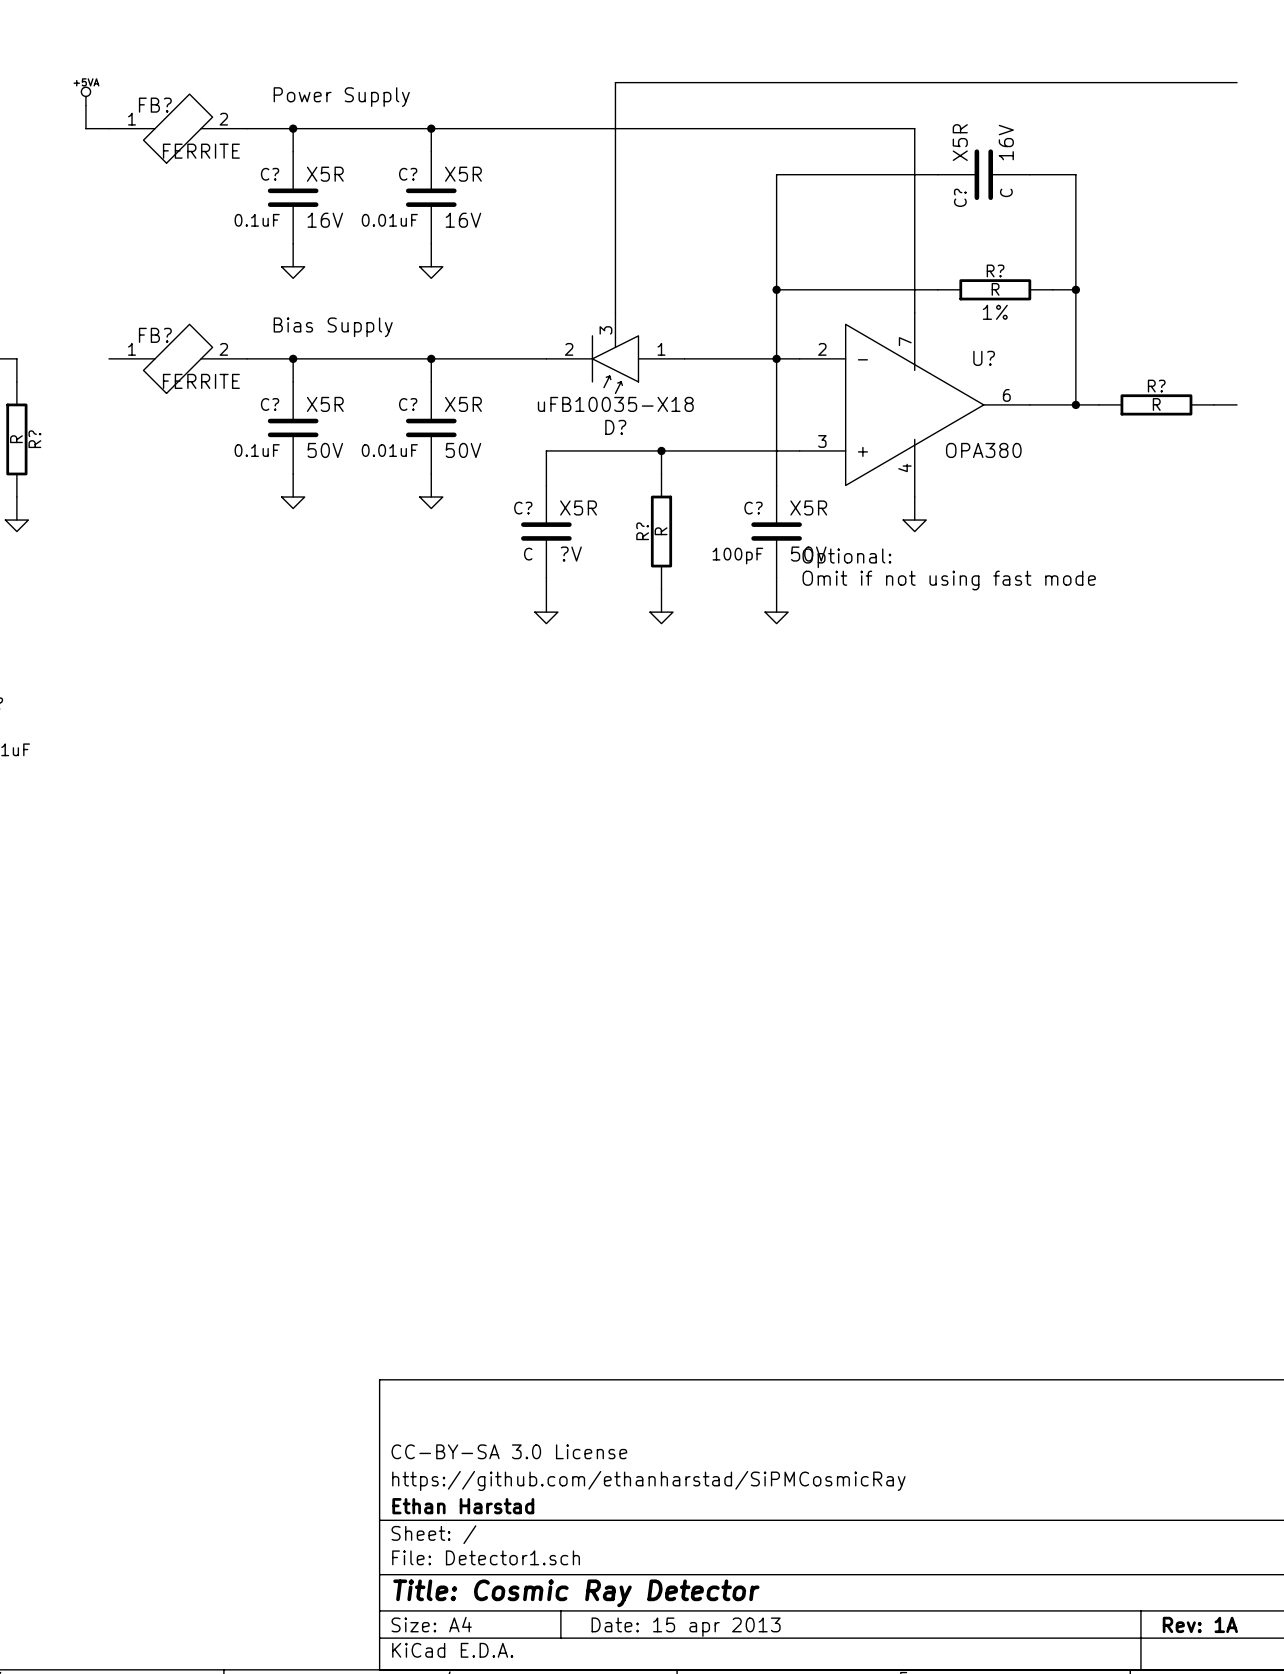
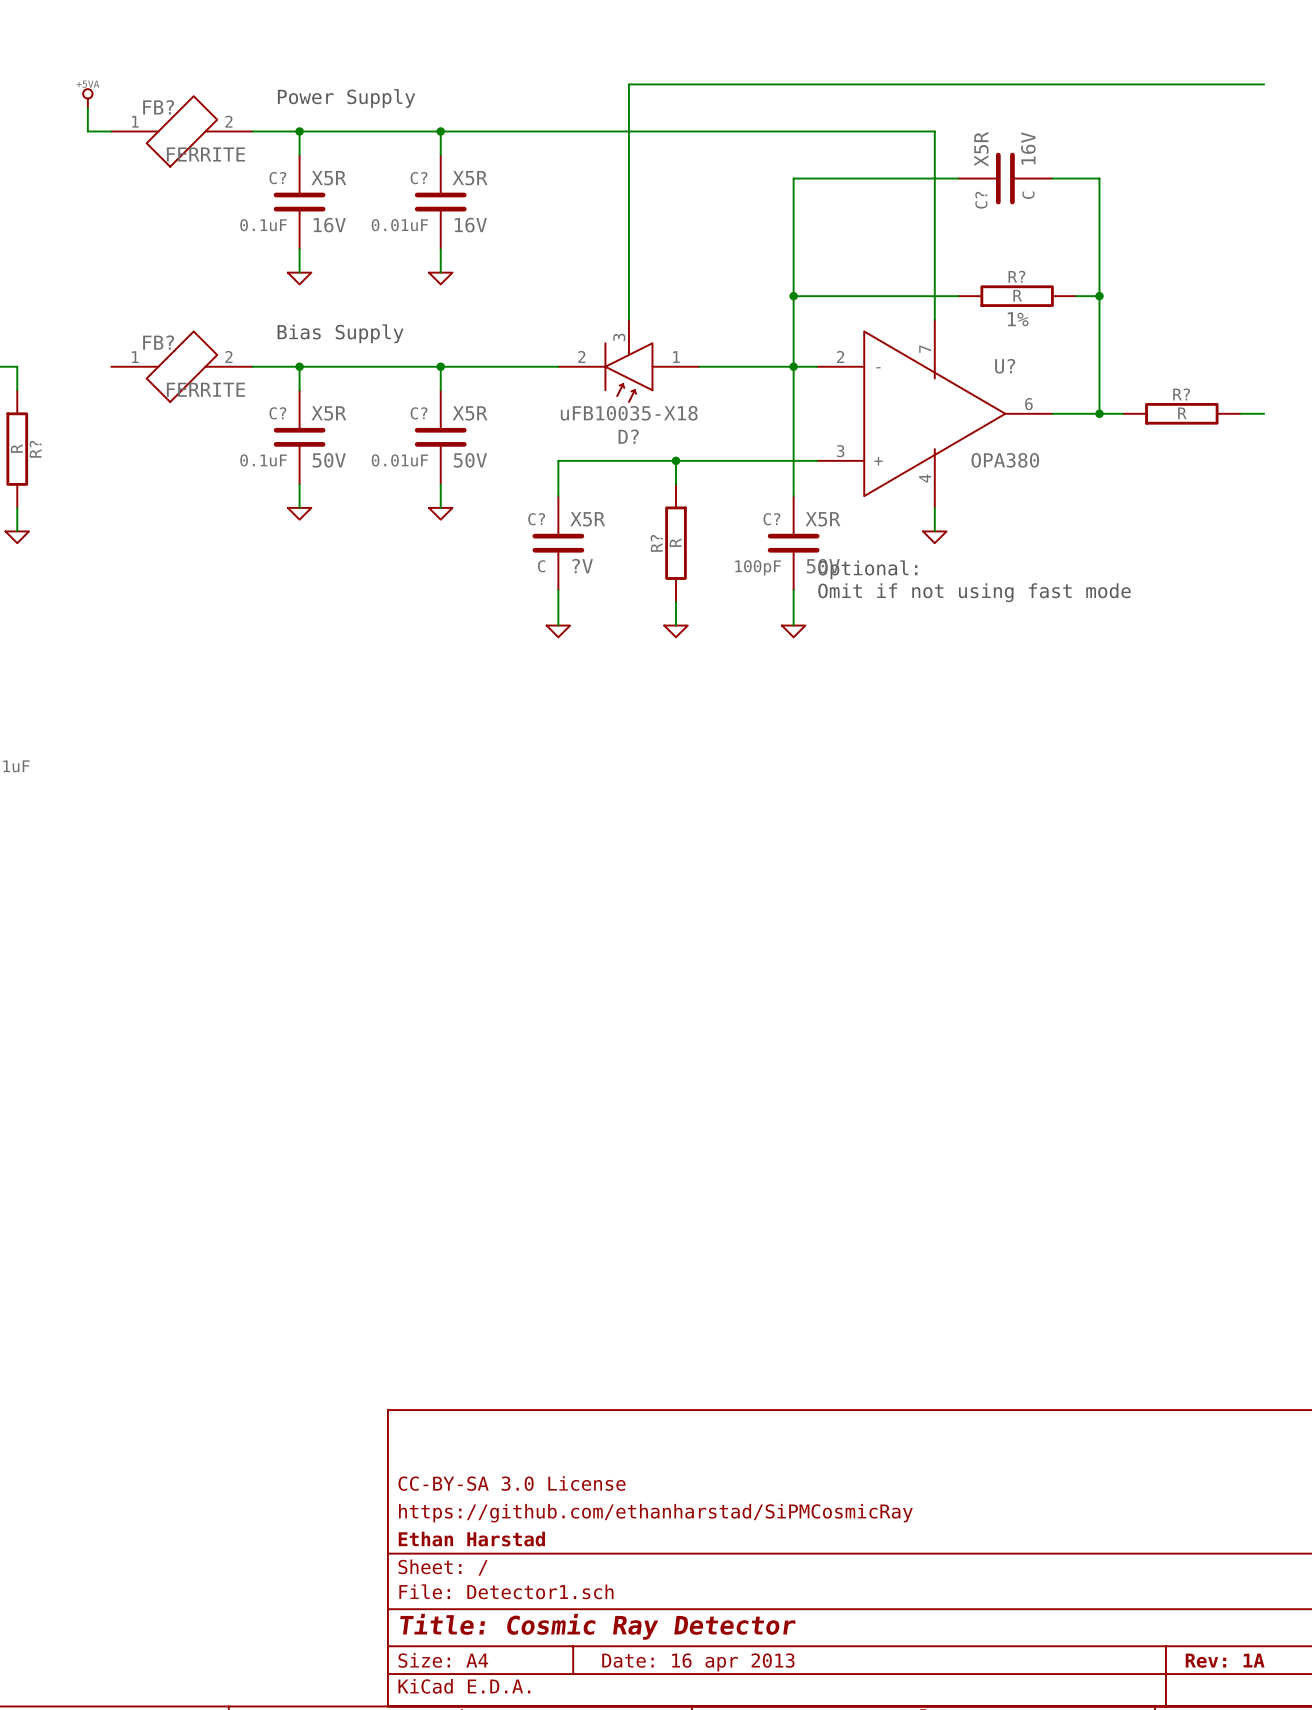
title block: Date: 15 apr 2013 (686, 1627) -> Date: 16 apr 2013 (698, 1662)

